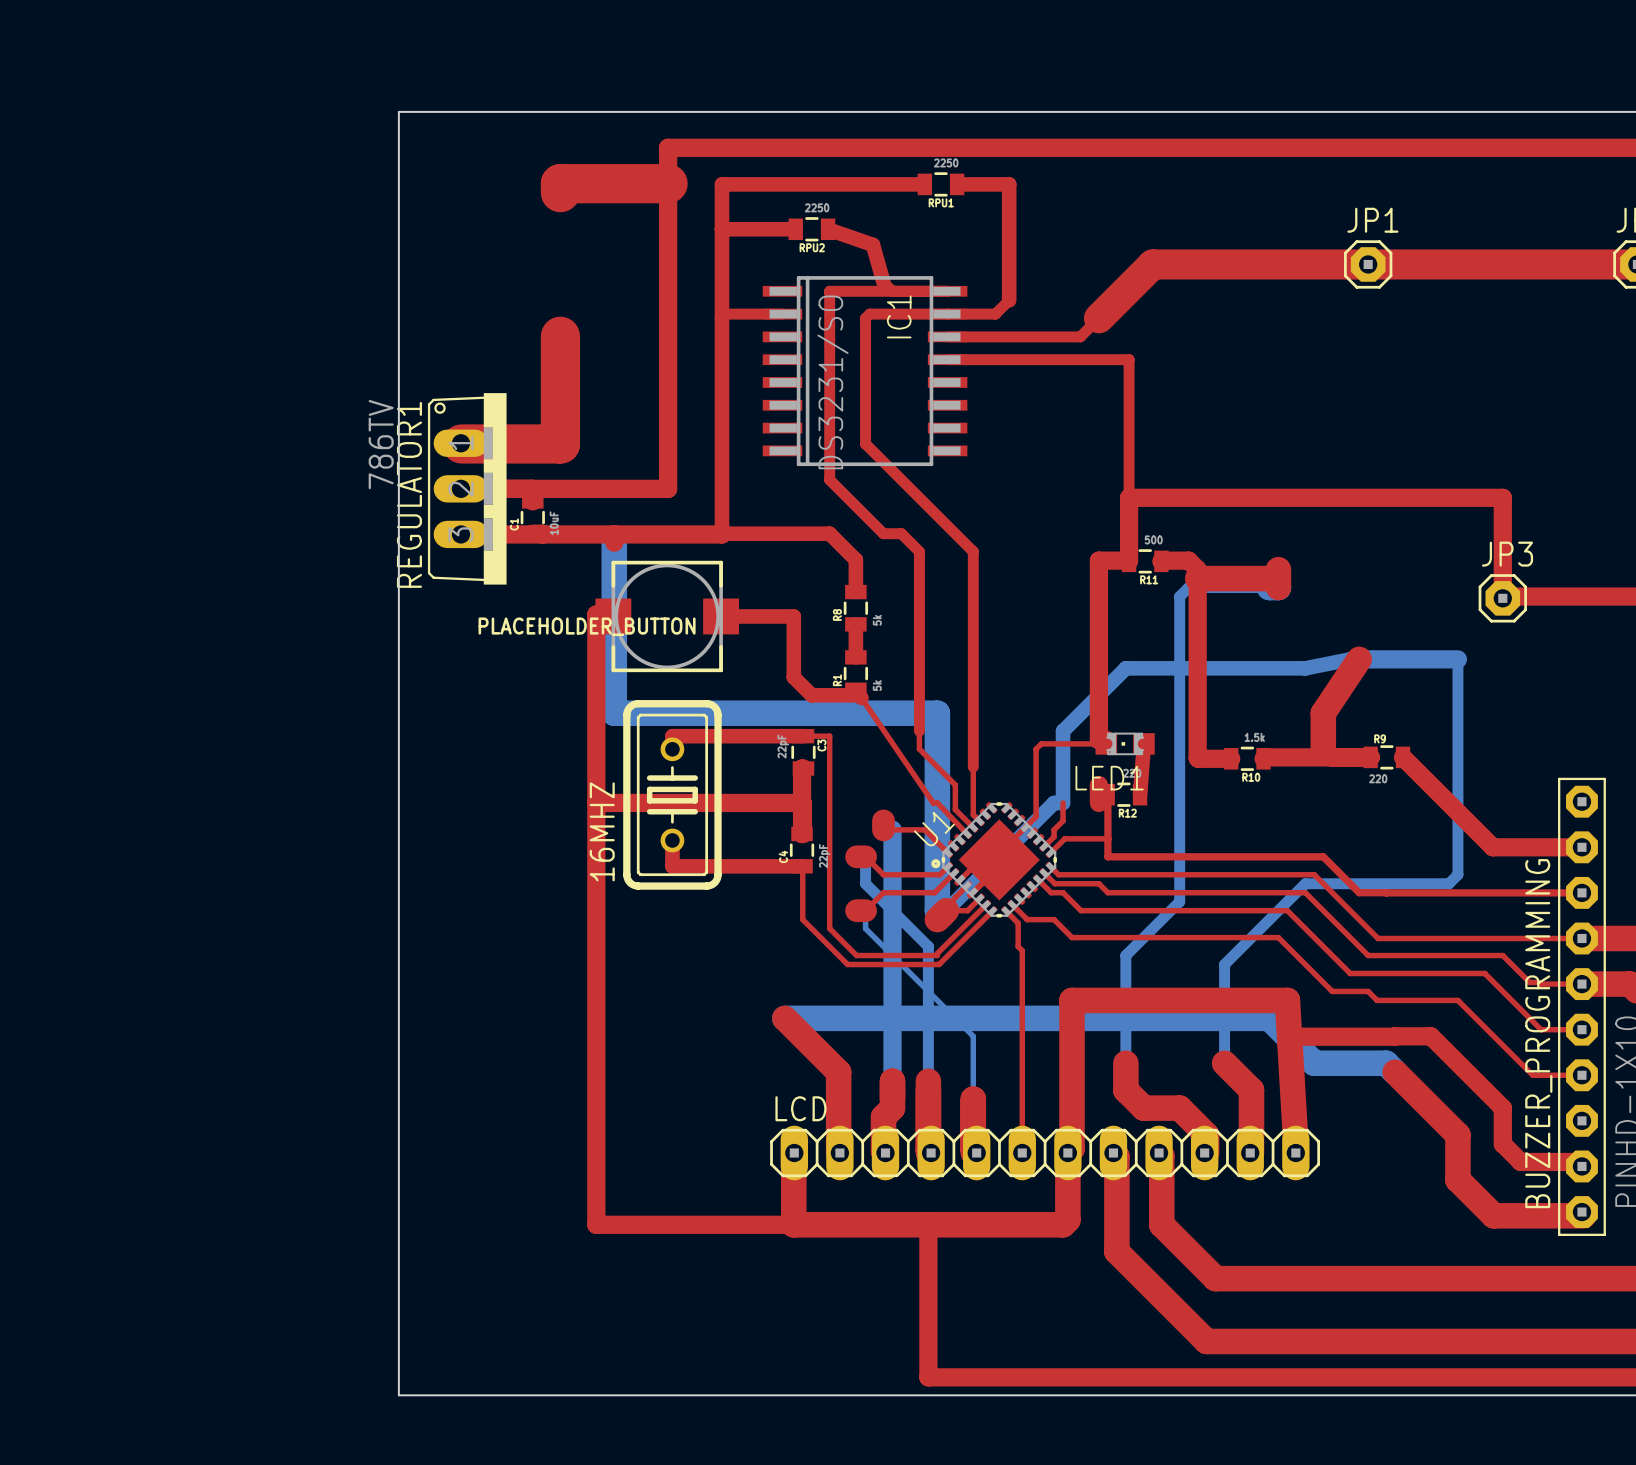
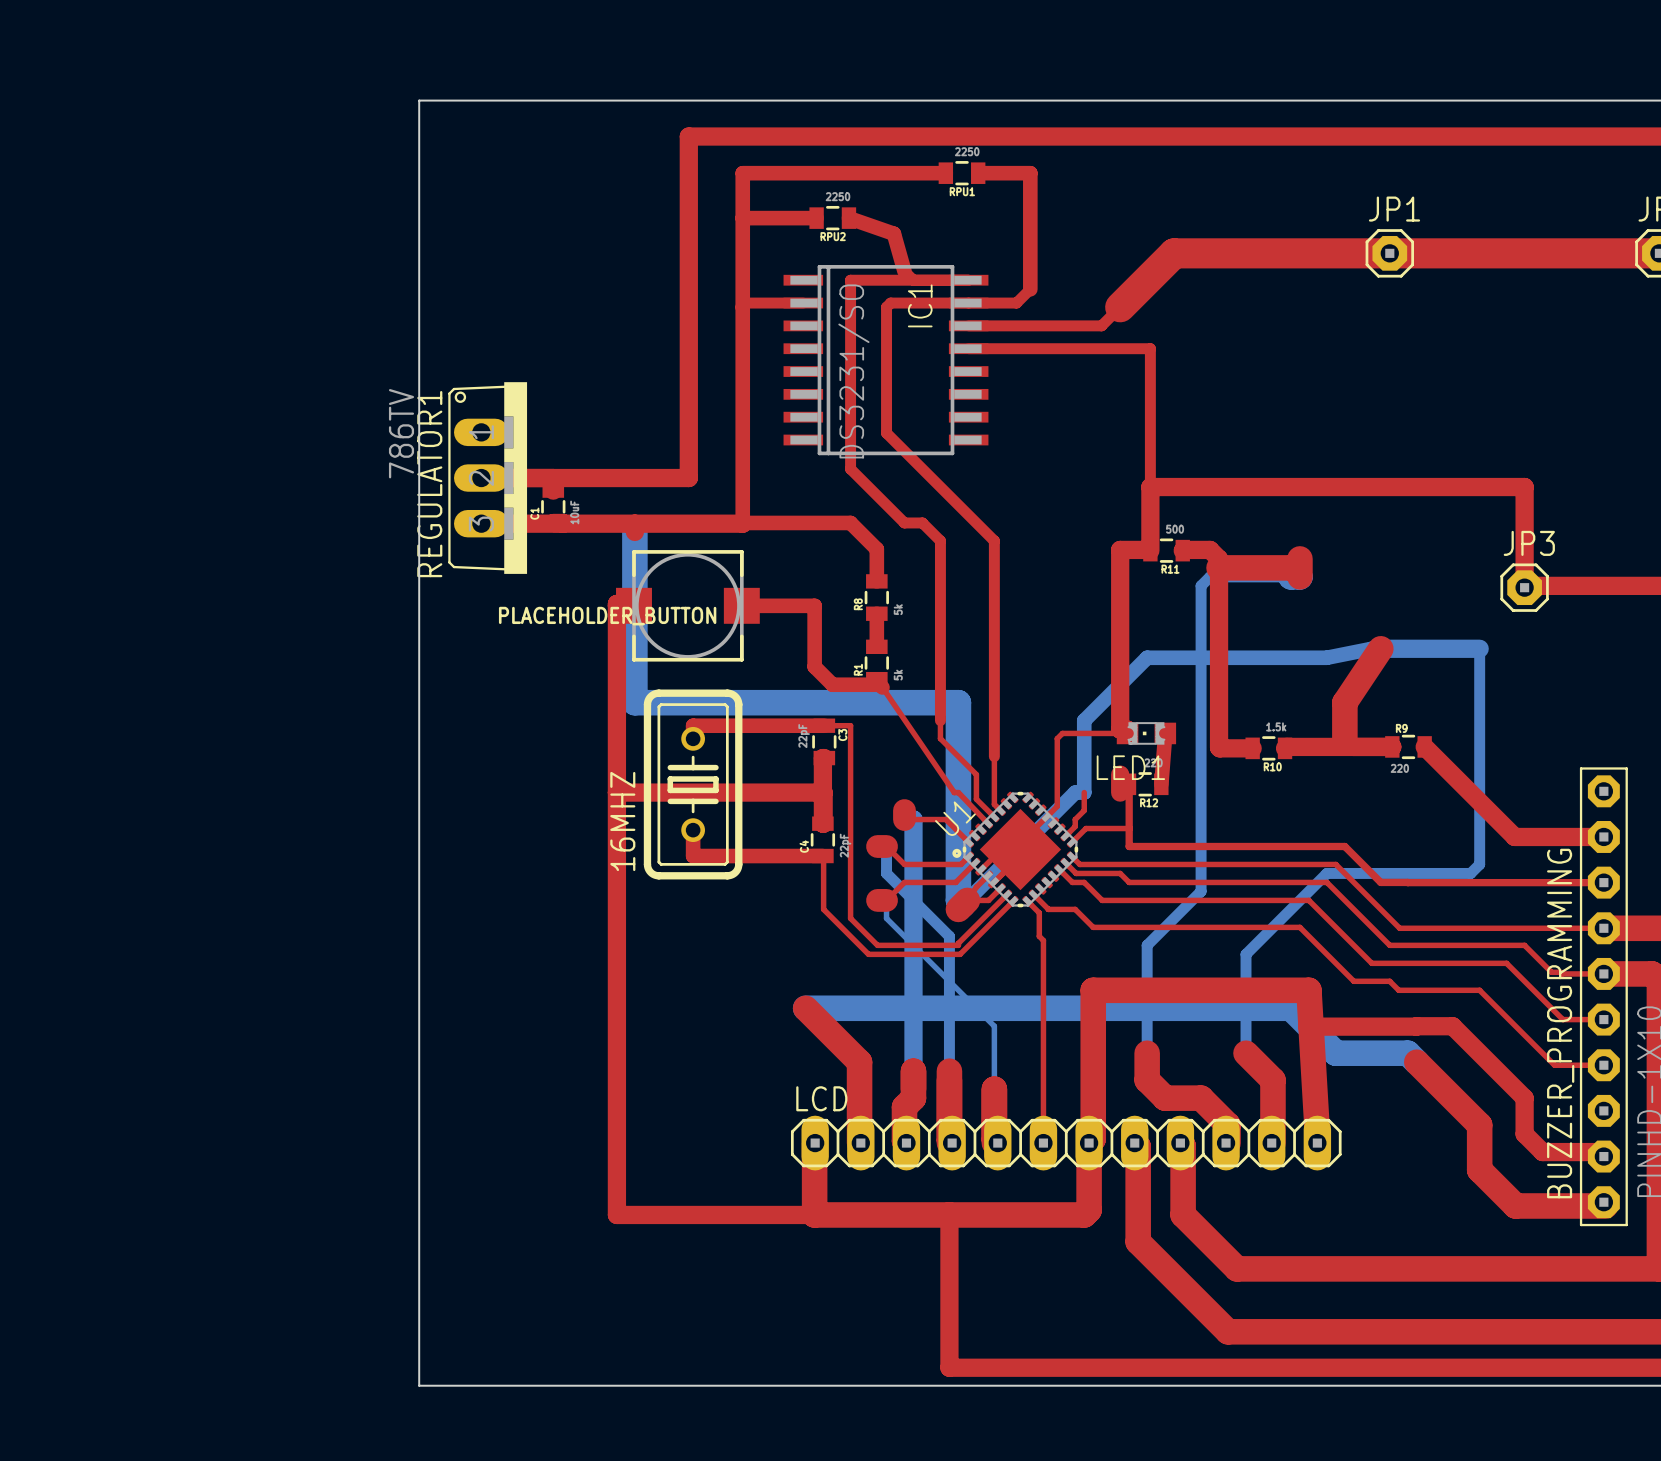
top track: (668, 183) (560, 183) (560, 192) -> none
top track: (560, 336) (560, 443) (461, 443) -> none

